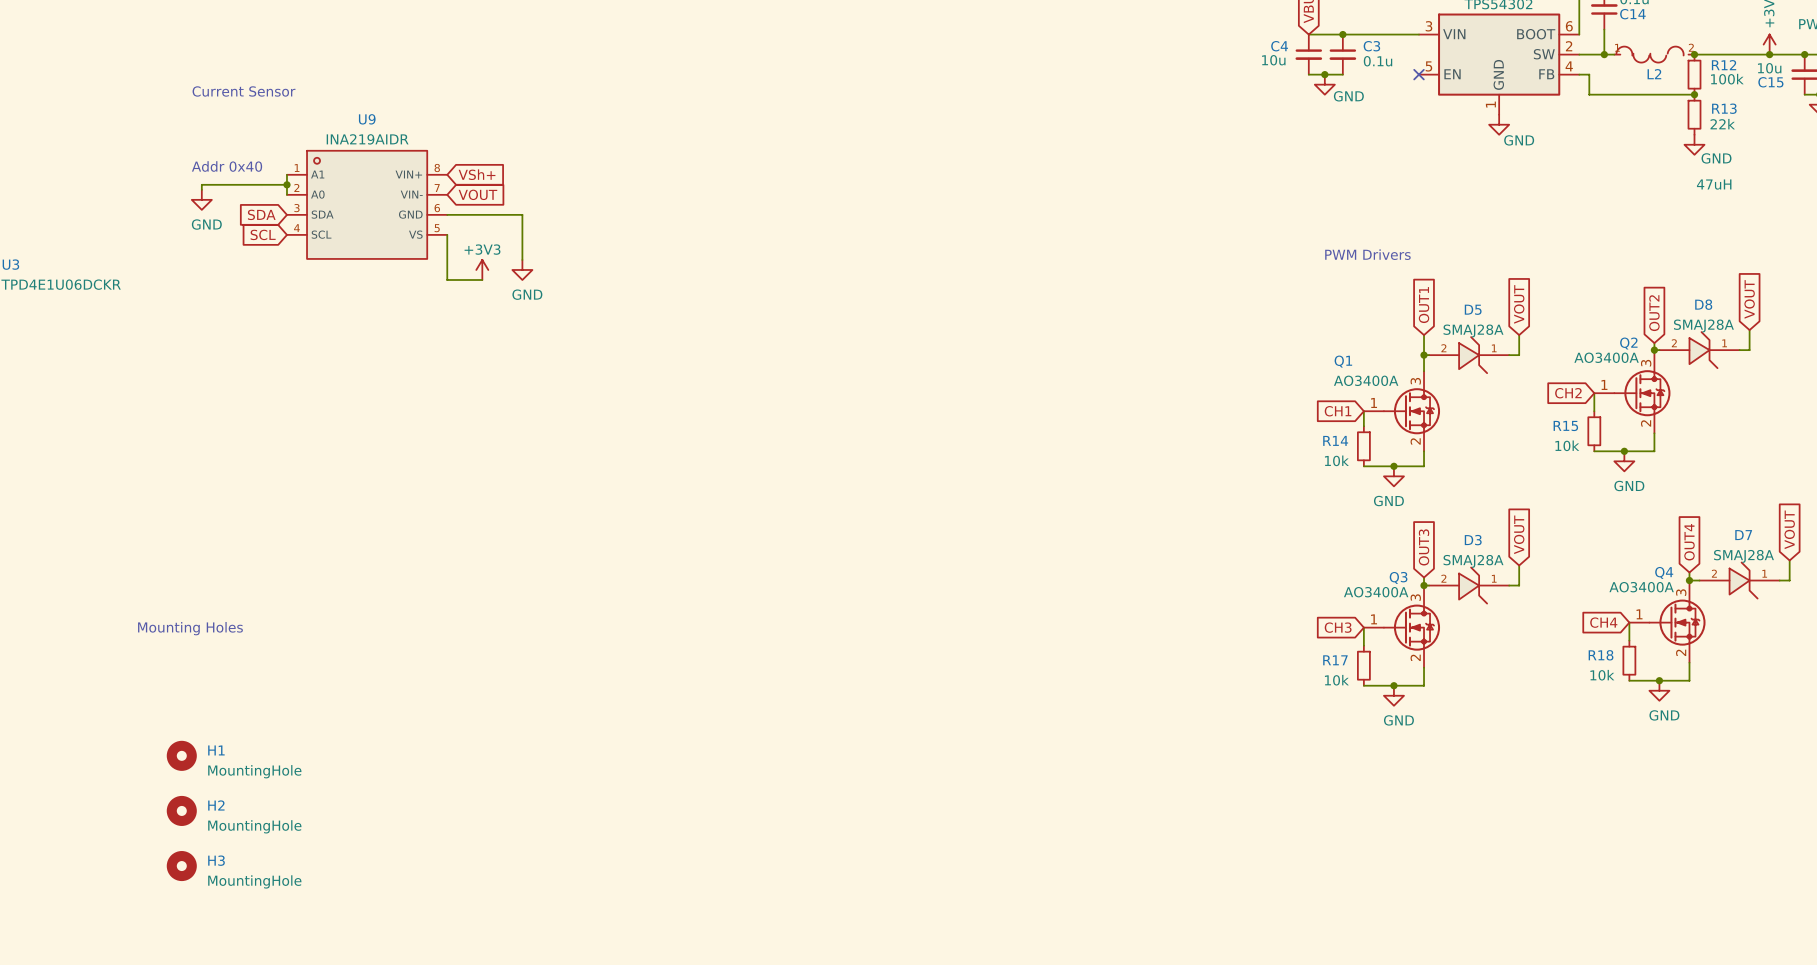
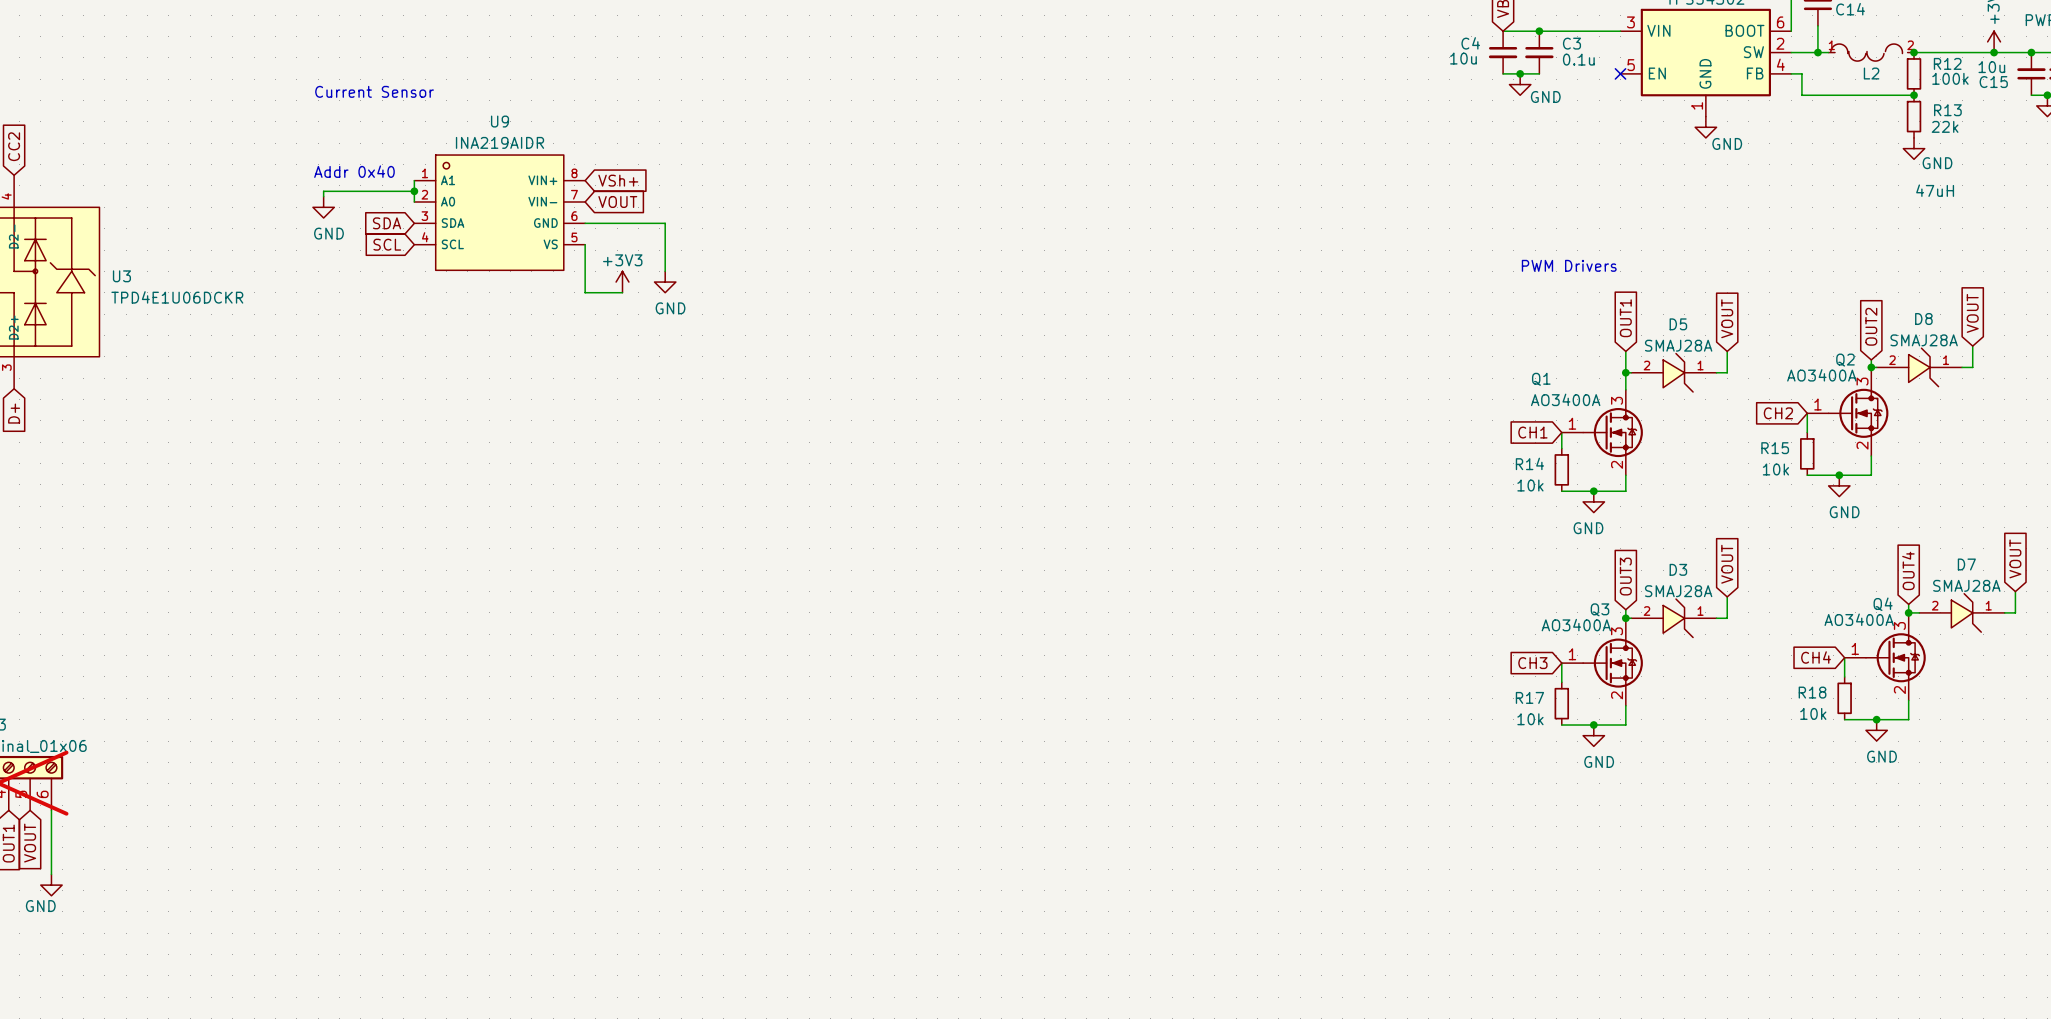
text: Mounting Holes (190, 628) -> none
H1: MountingHole (181, 755) -> none
H2: MountingHole (181, 810) -> none
H3: MountingHole (181, 866) -> none

